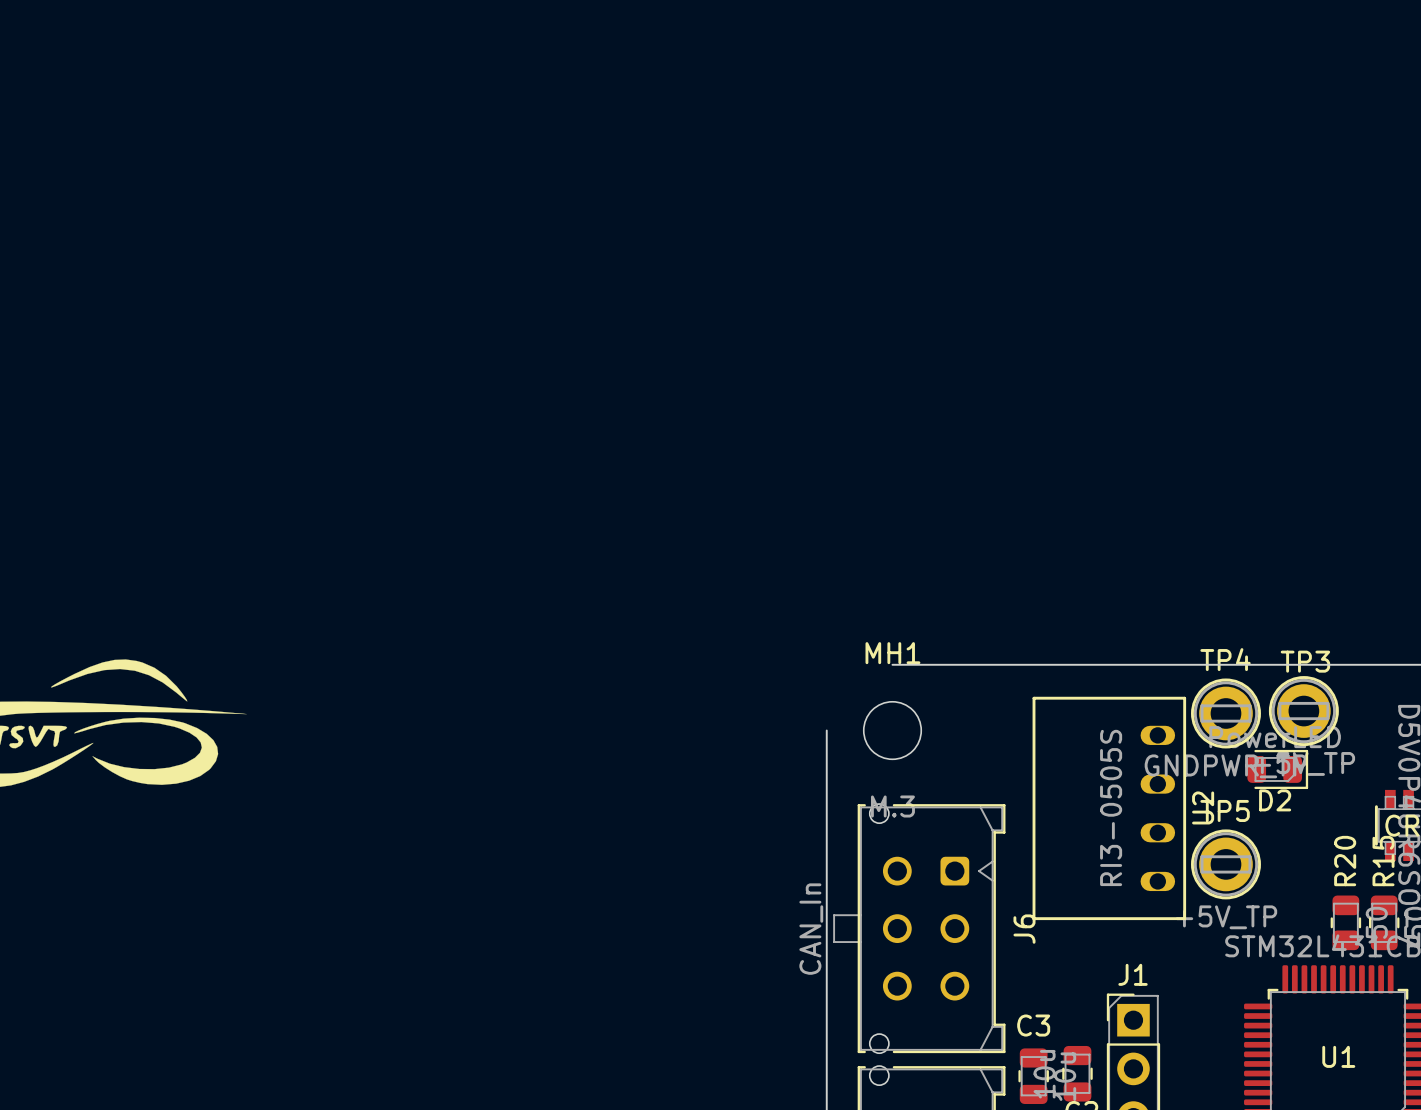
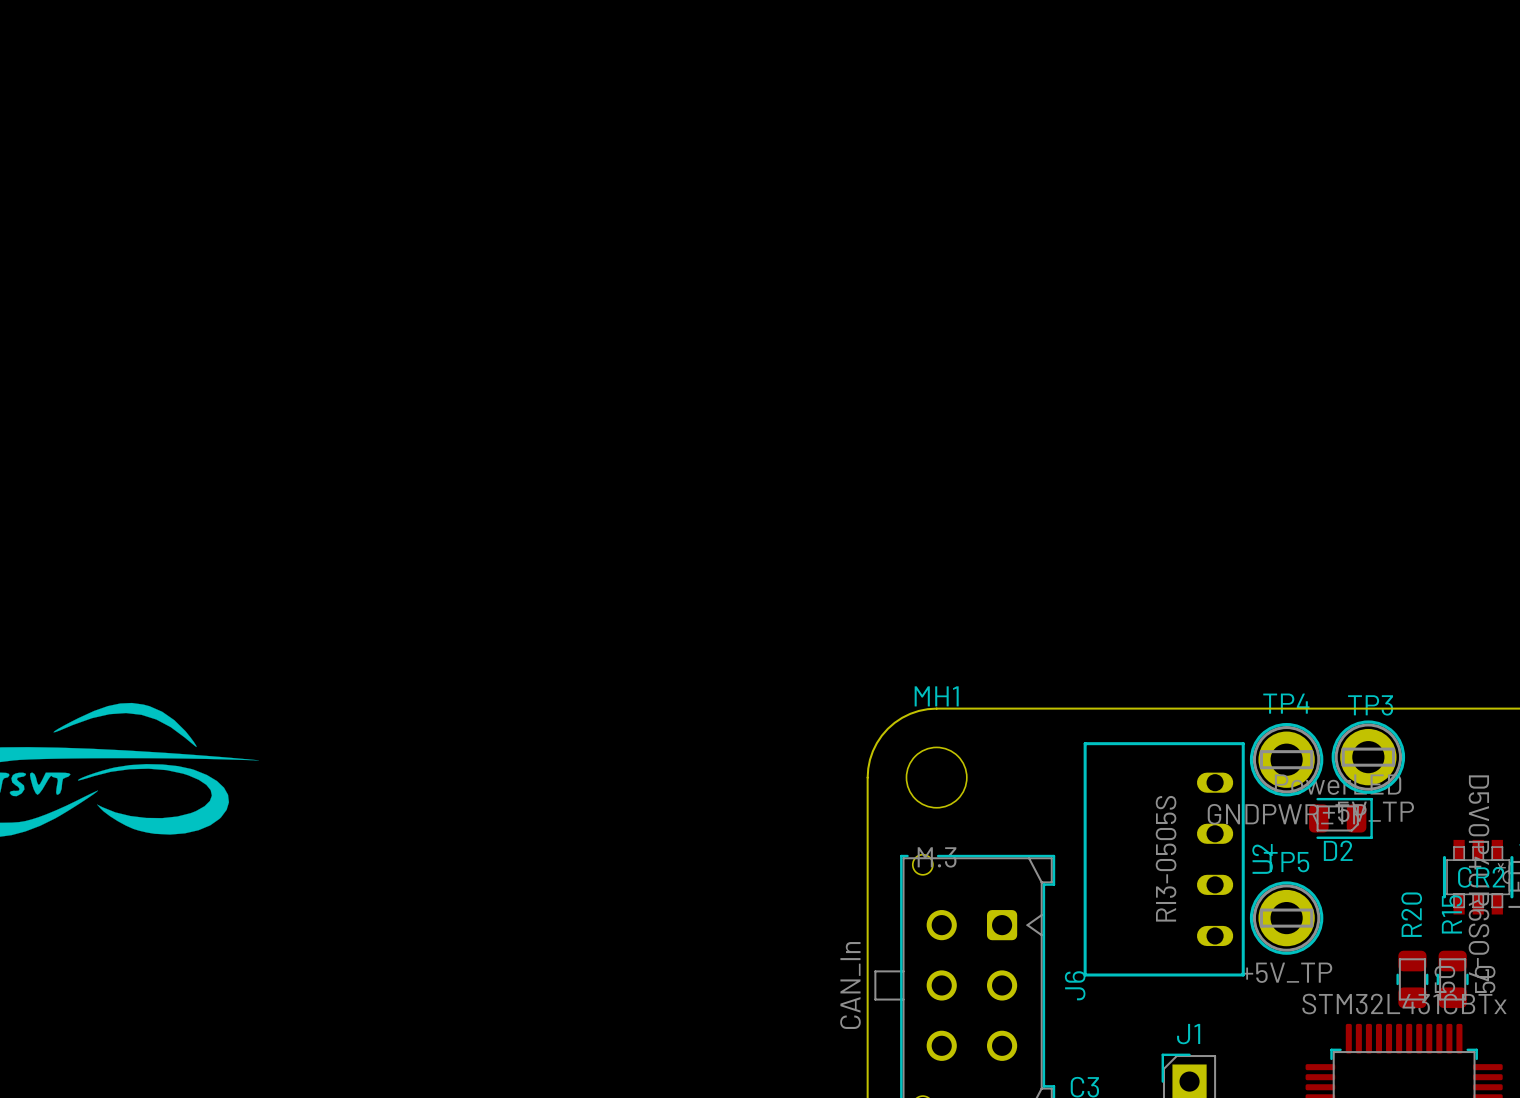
board edge: none -> (936, 708) (910, 713) (887, 728) (872, 751) (867, 777)

